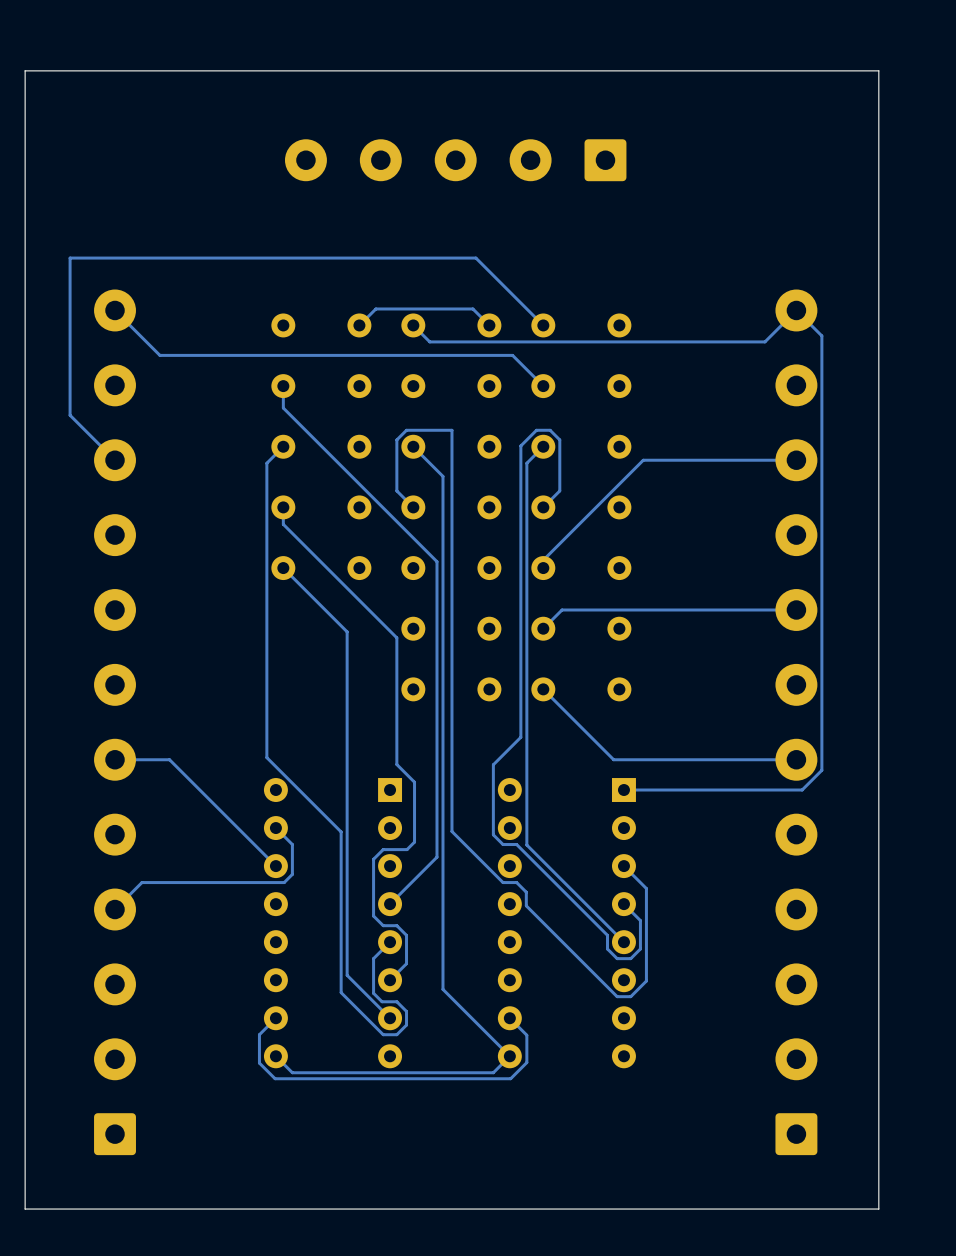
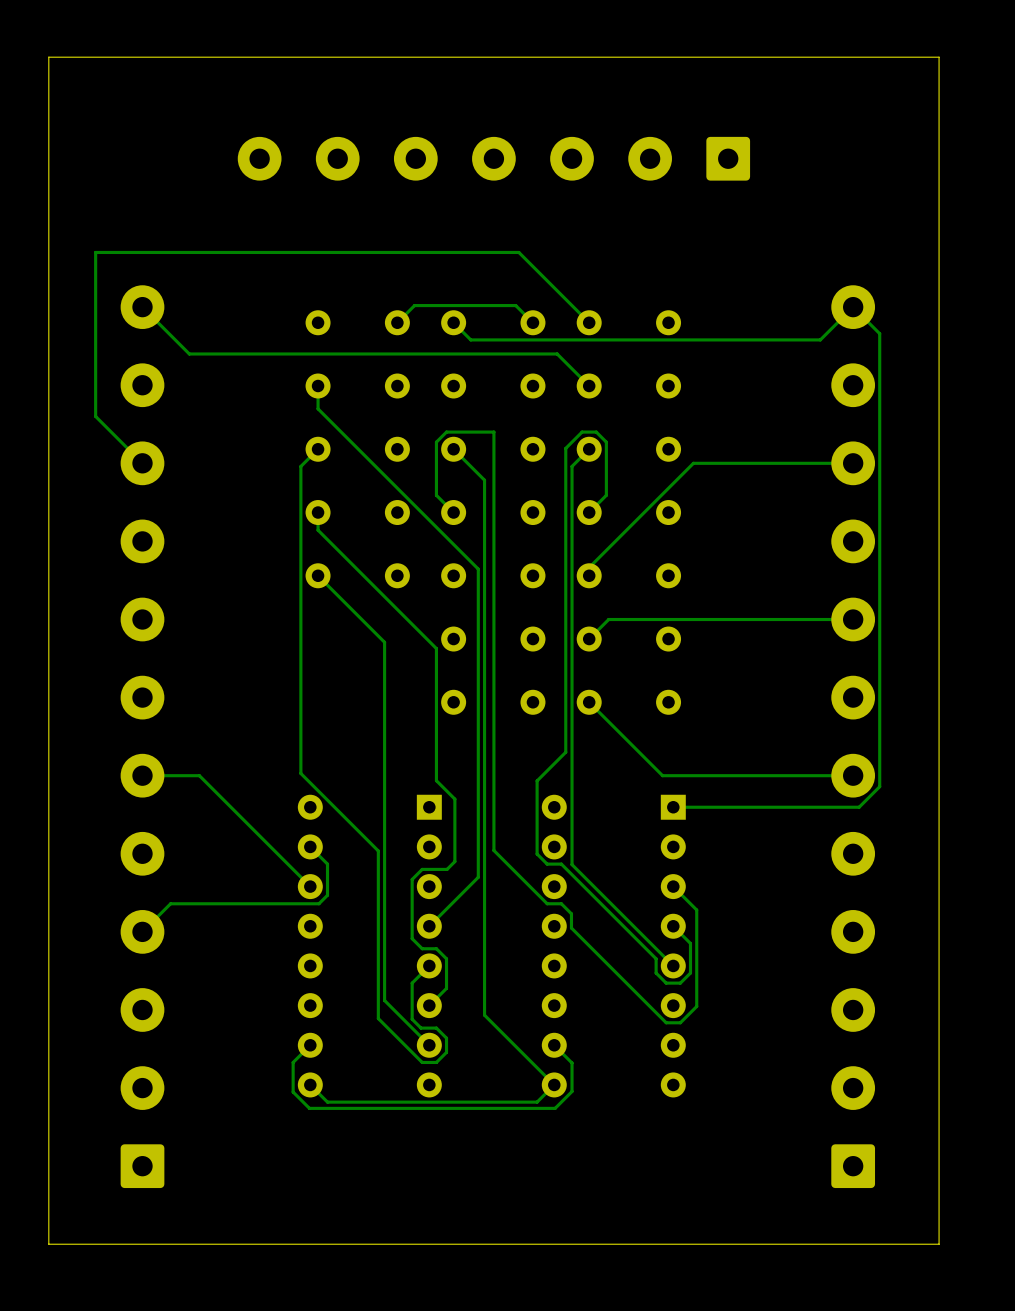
part footprint: [284, 139, 627, 182] -> [237, 136, 751, 181]

